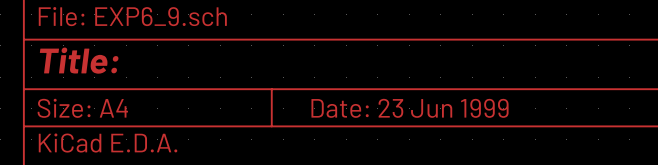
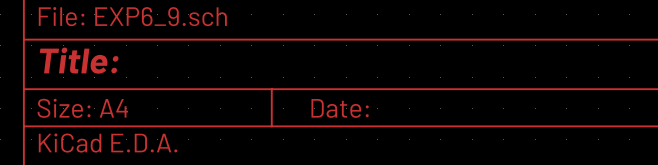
title block: Date: 23 Jun 1999 (410, 108) -> Date: (340, 108)

